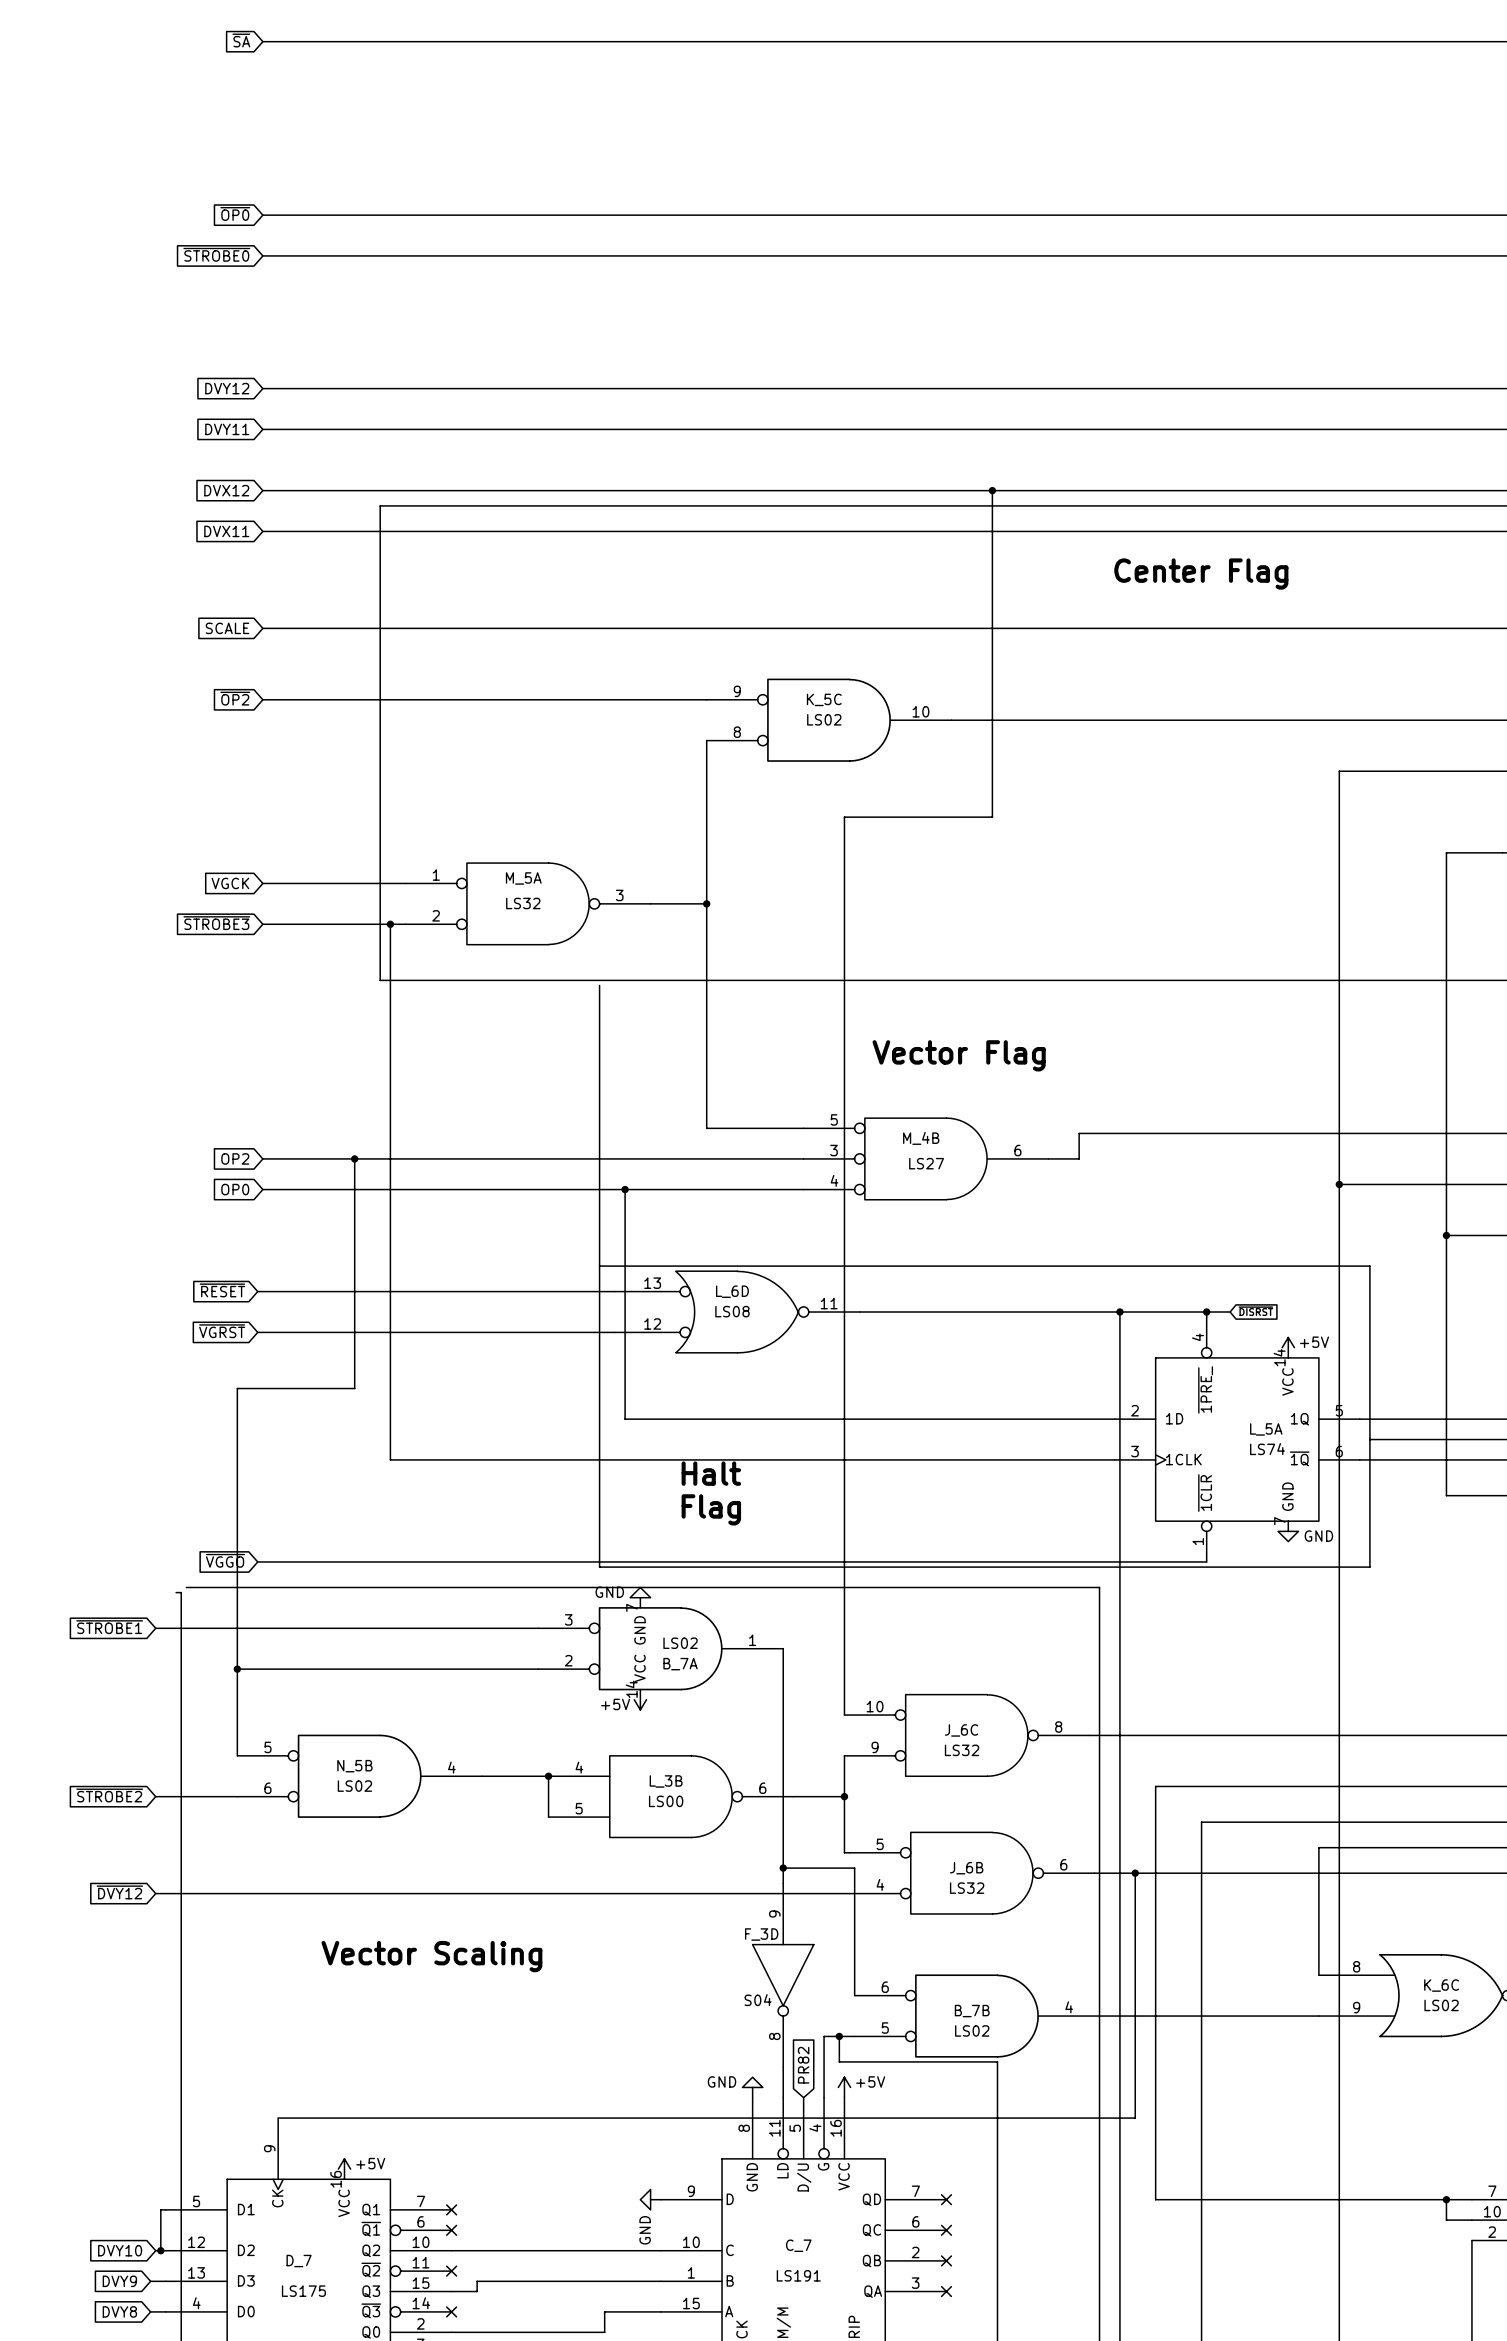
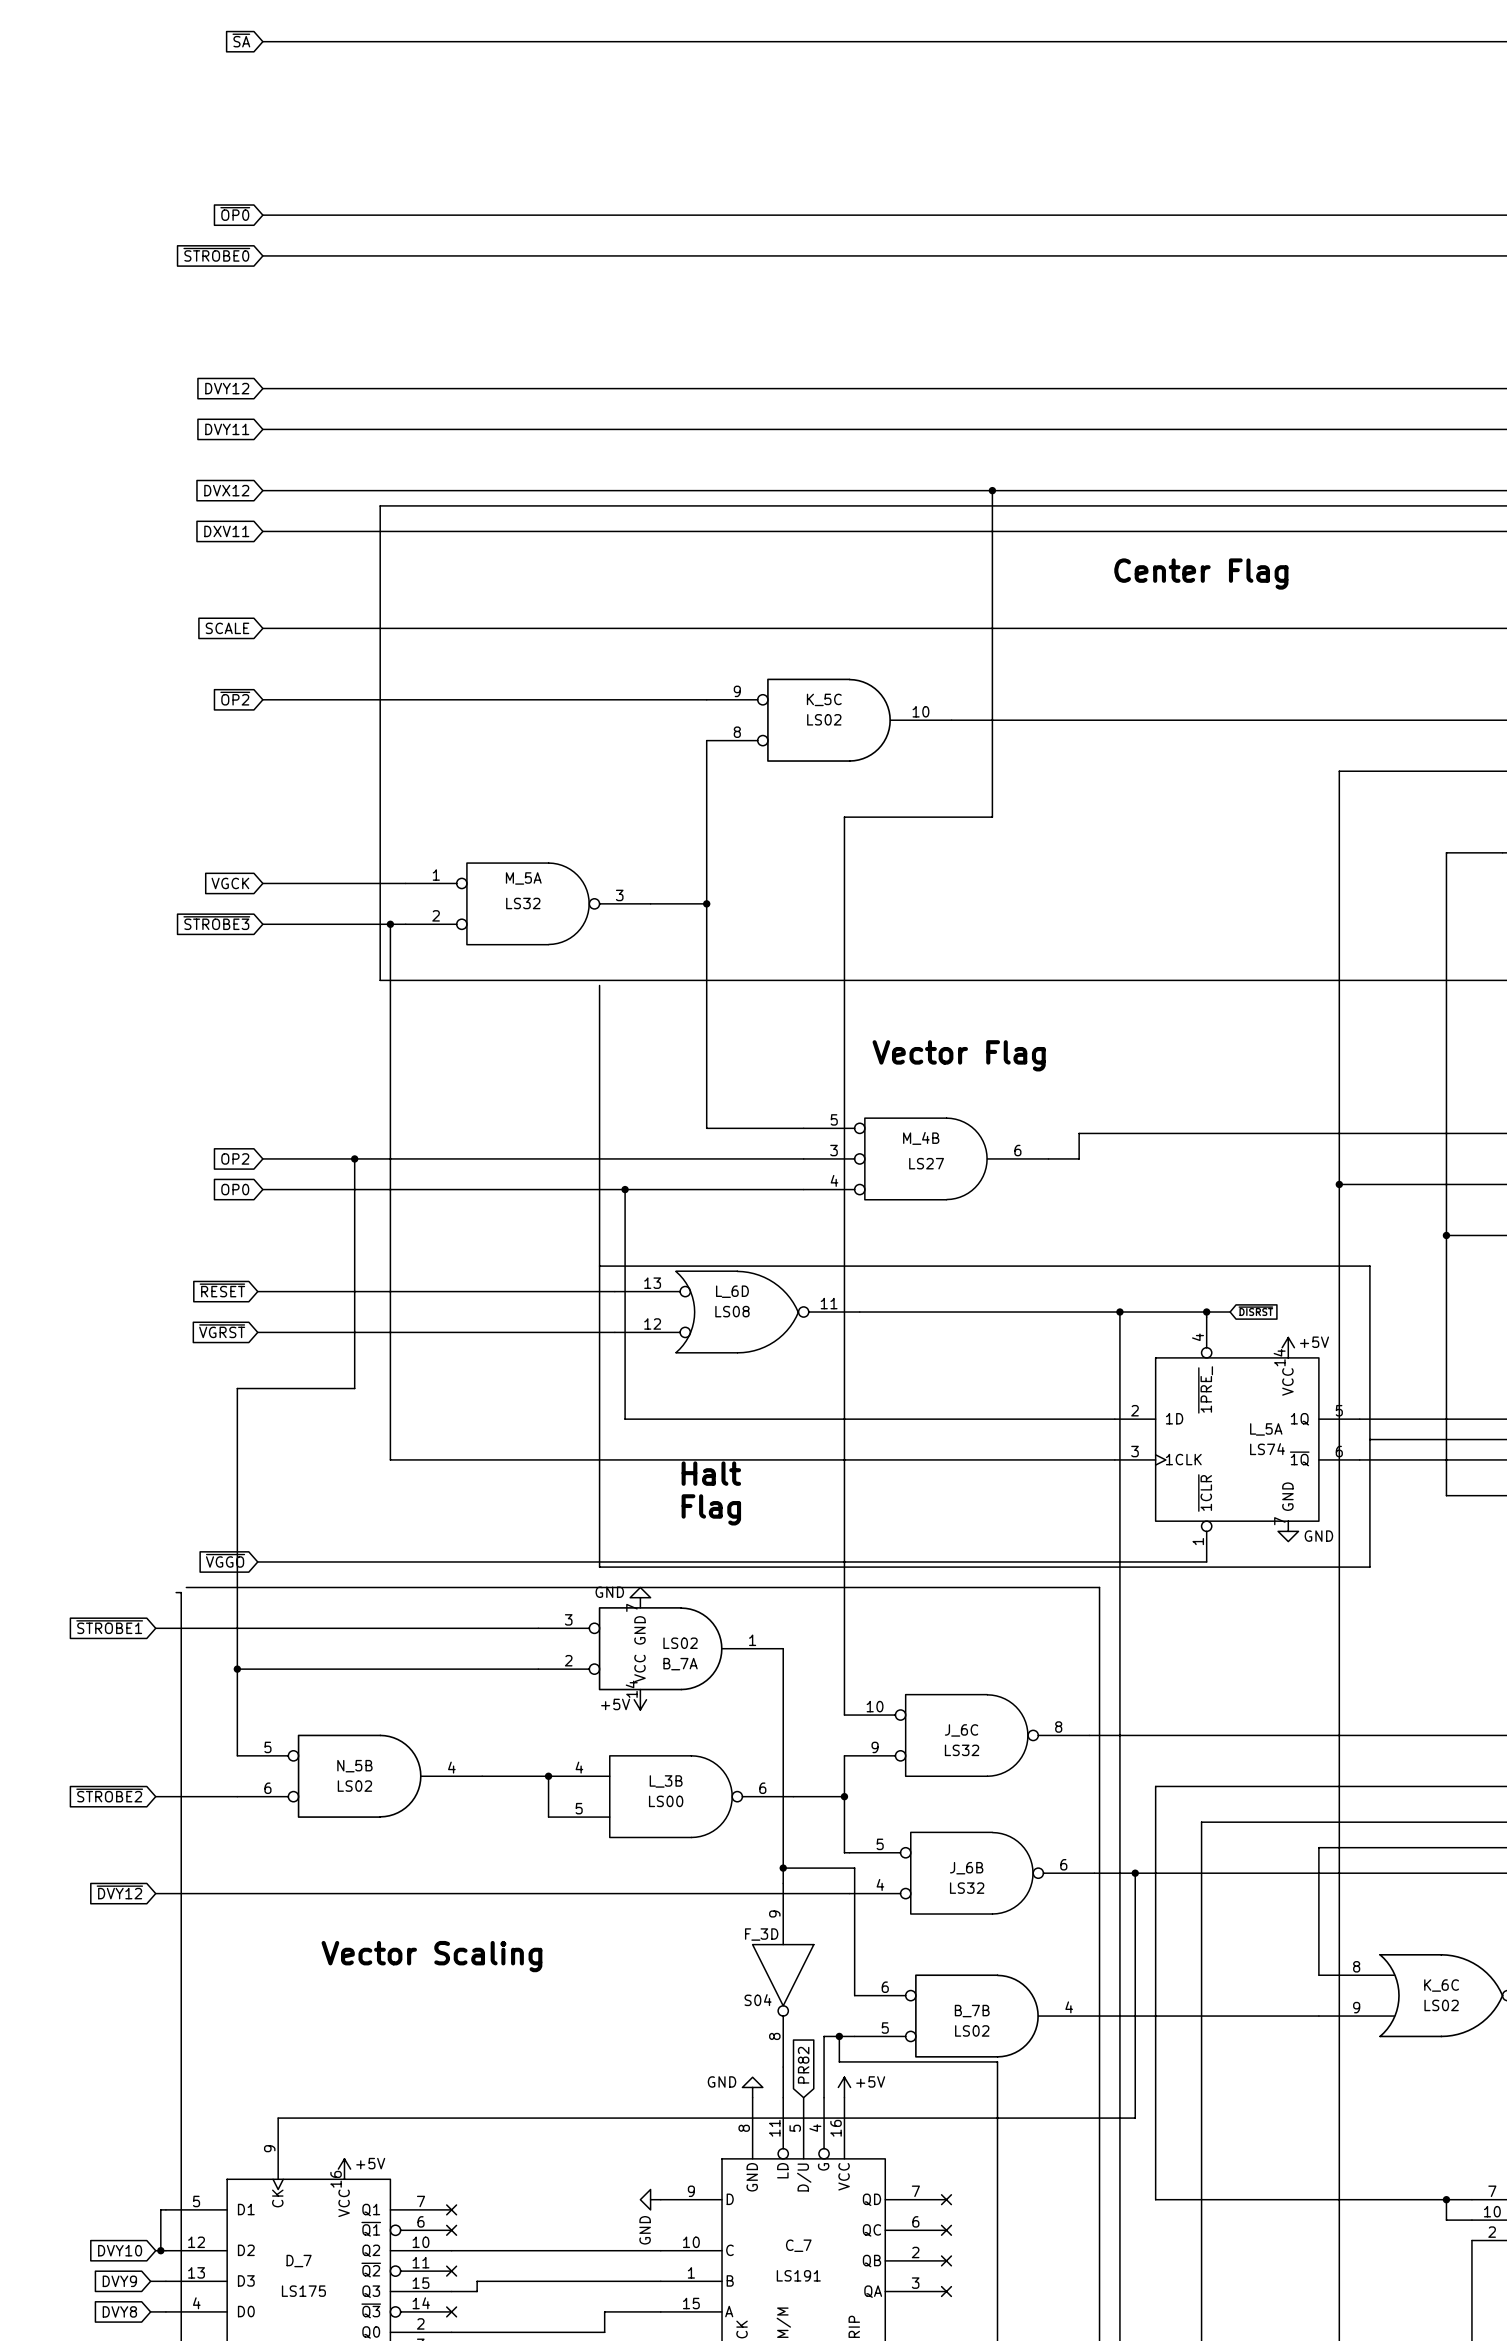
global label: DVX11 (226, 531) -> DXV11 (226, 531)

